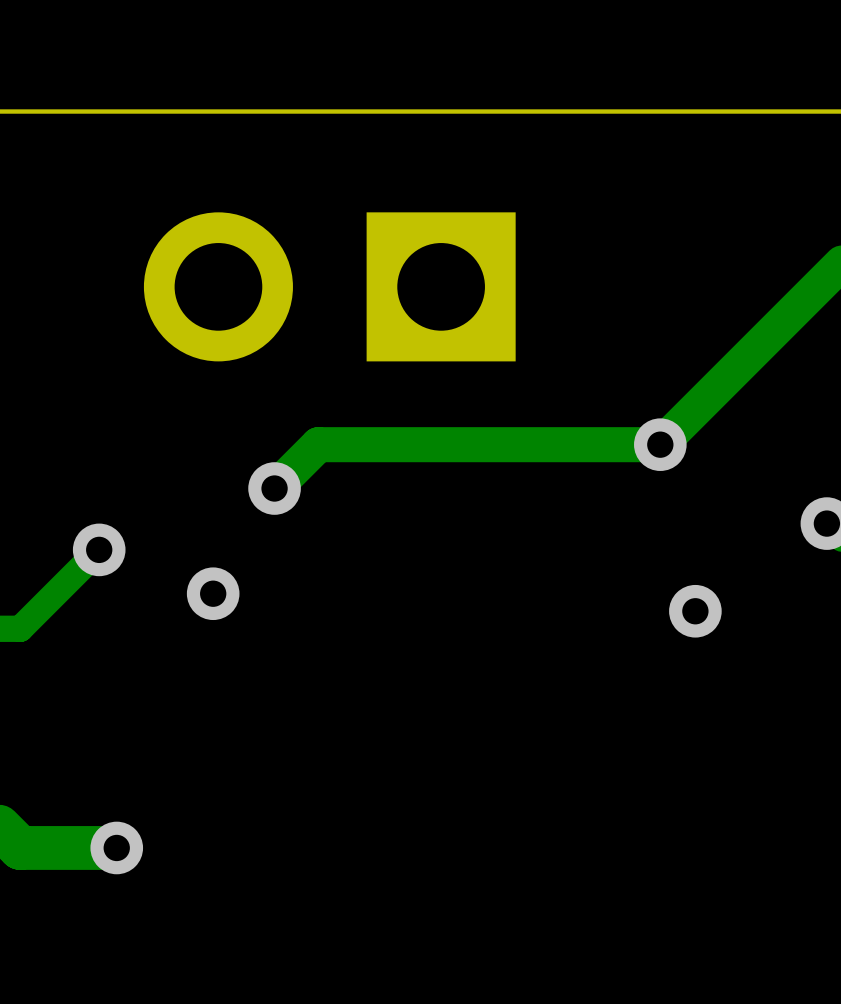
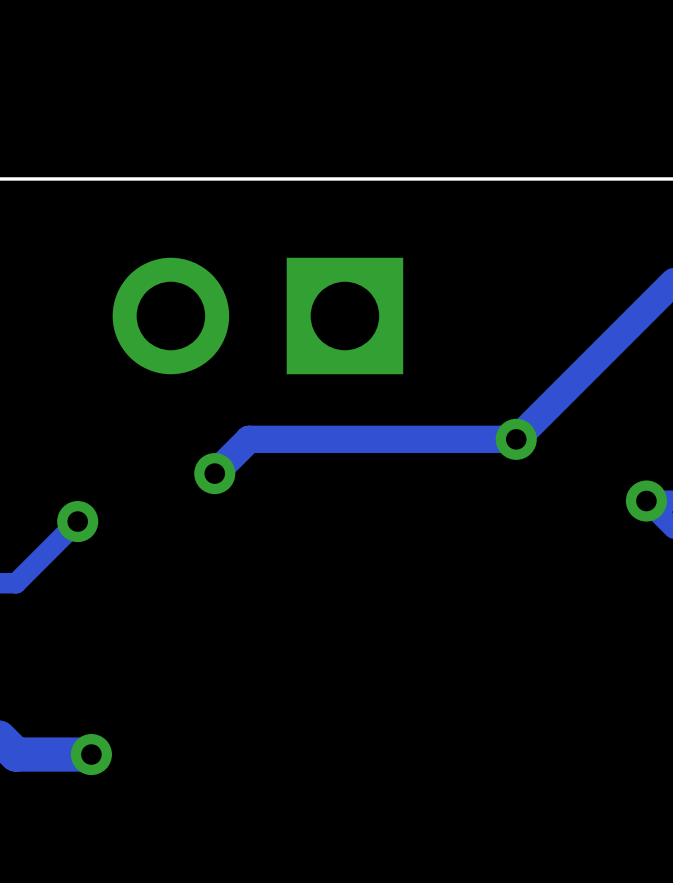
via: (213, 593) -> none
via: (695, 611) -> none

